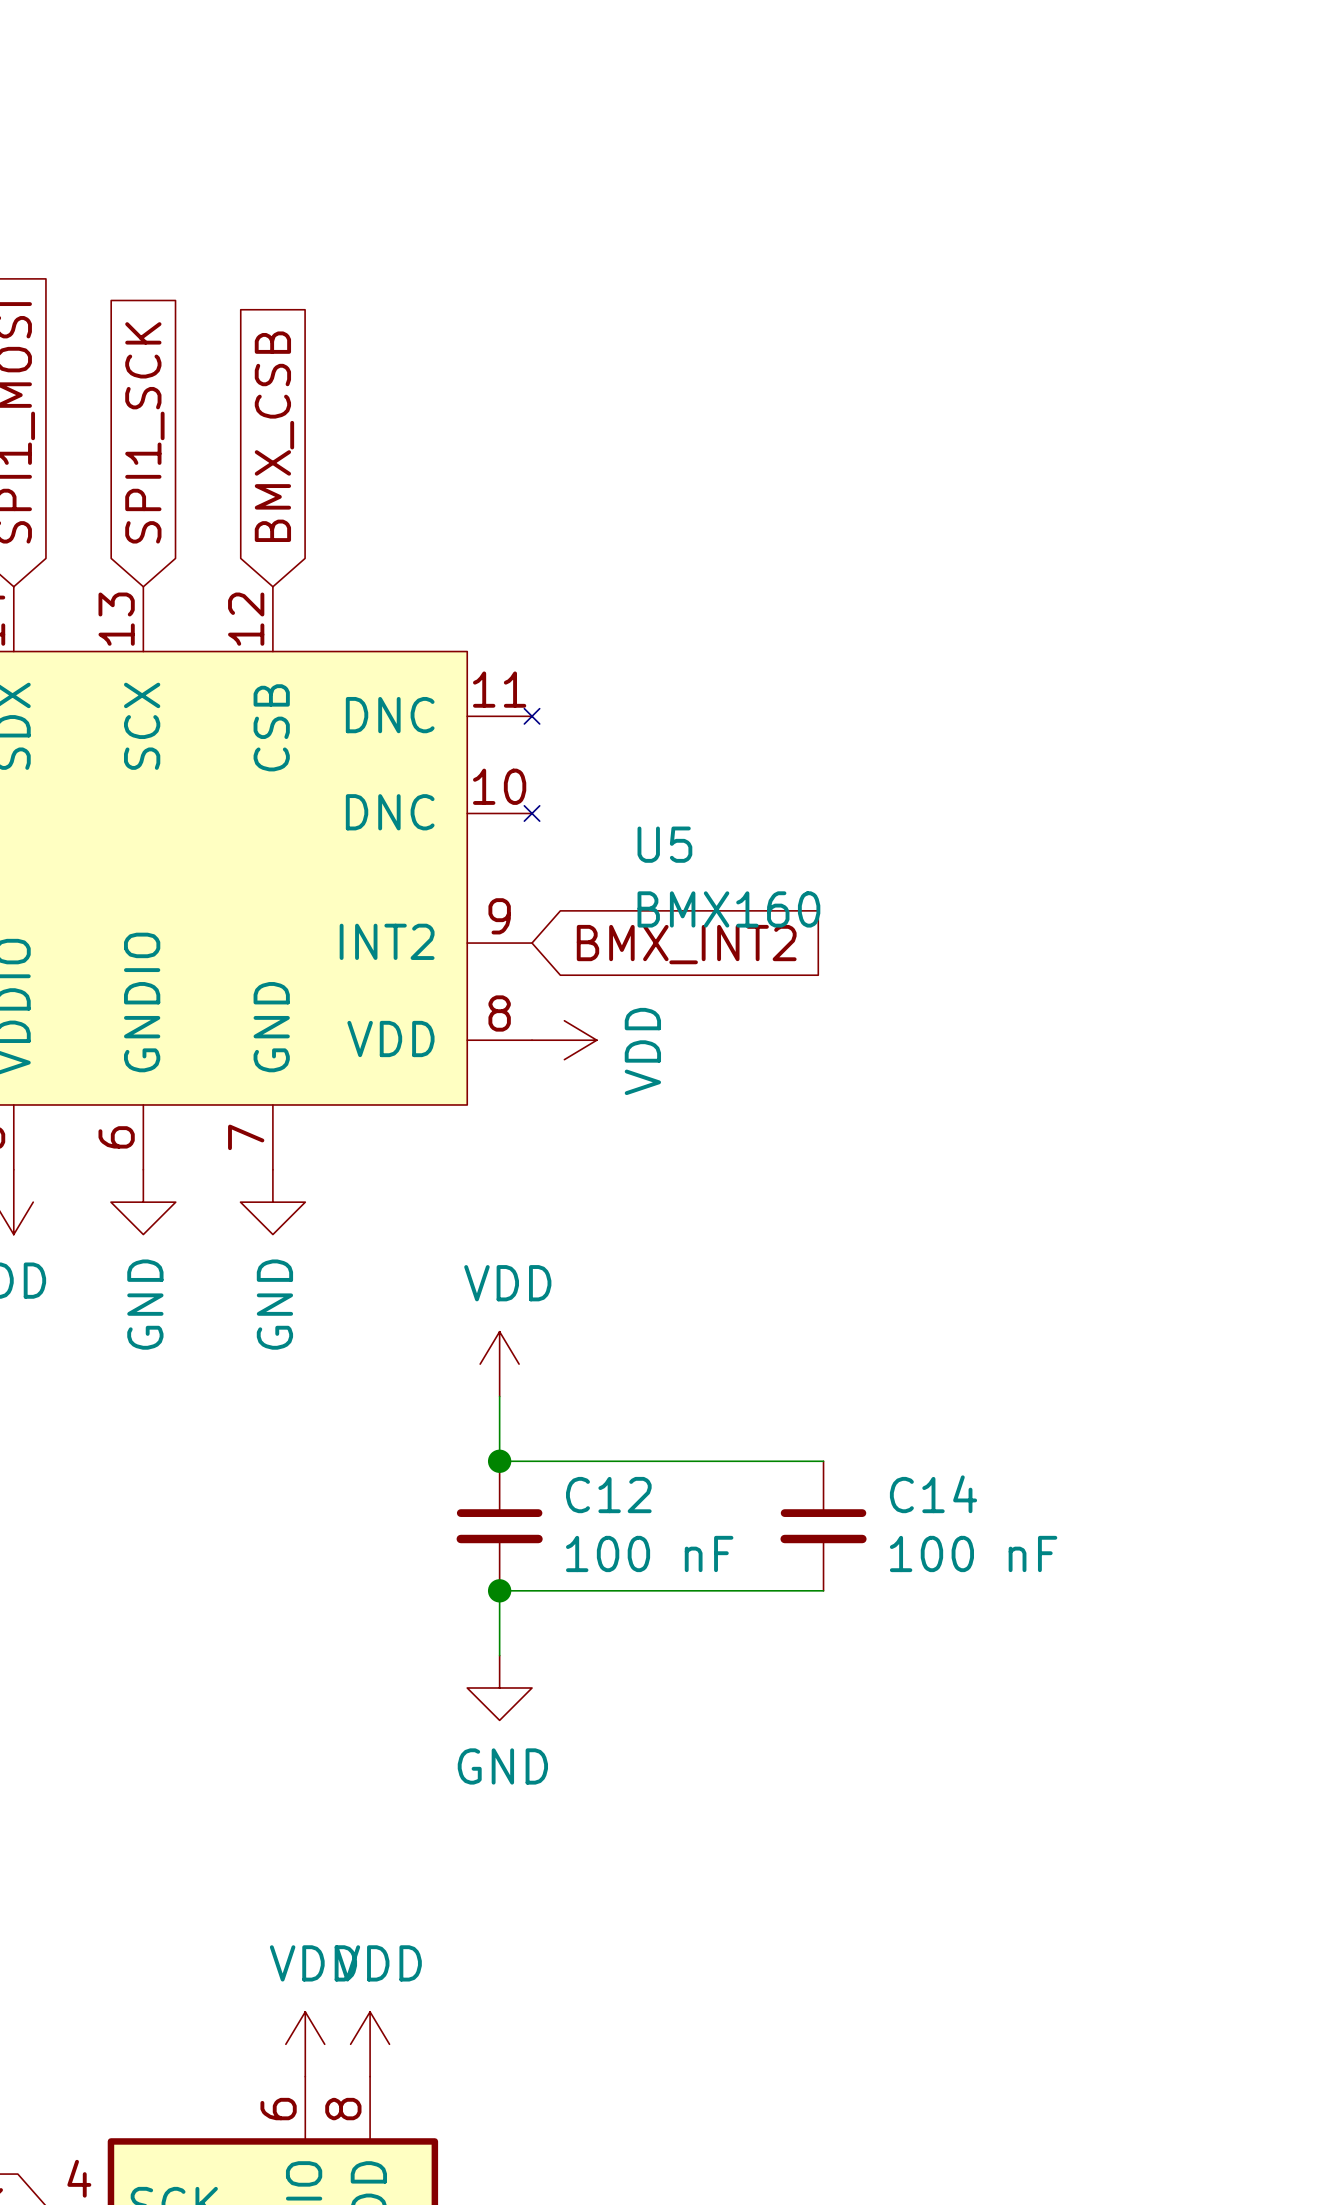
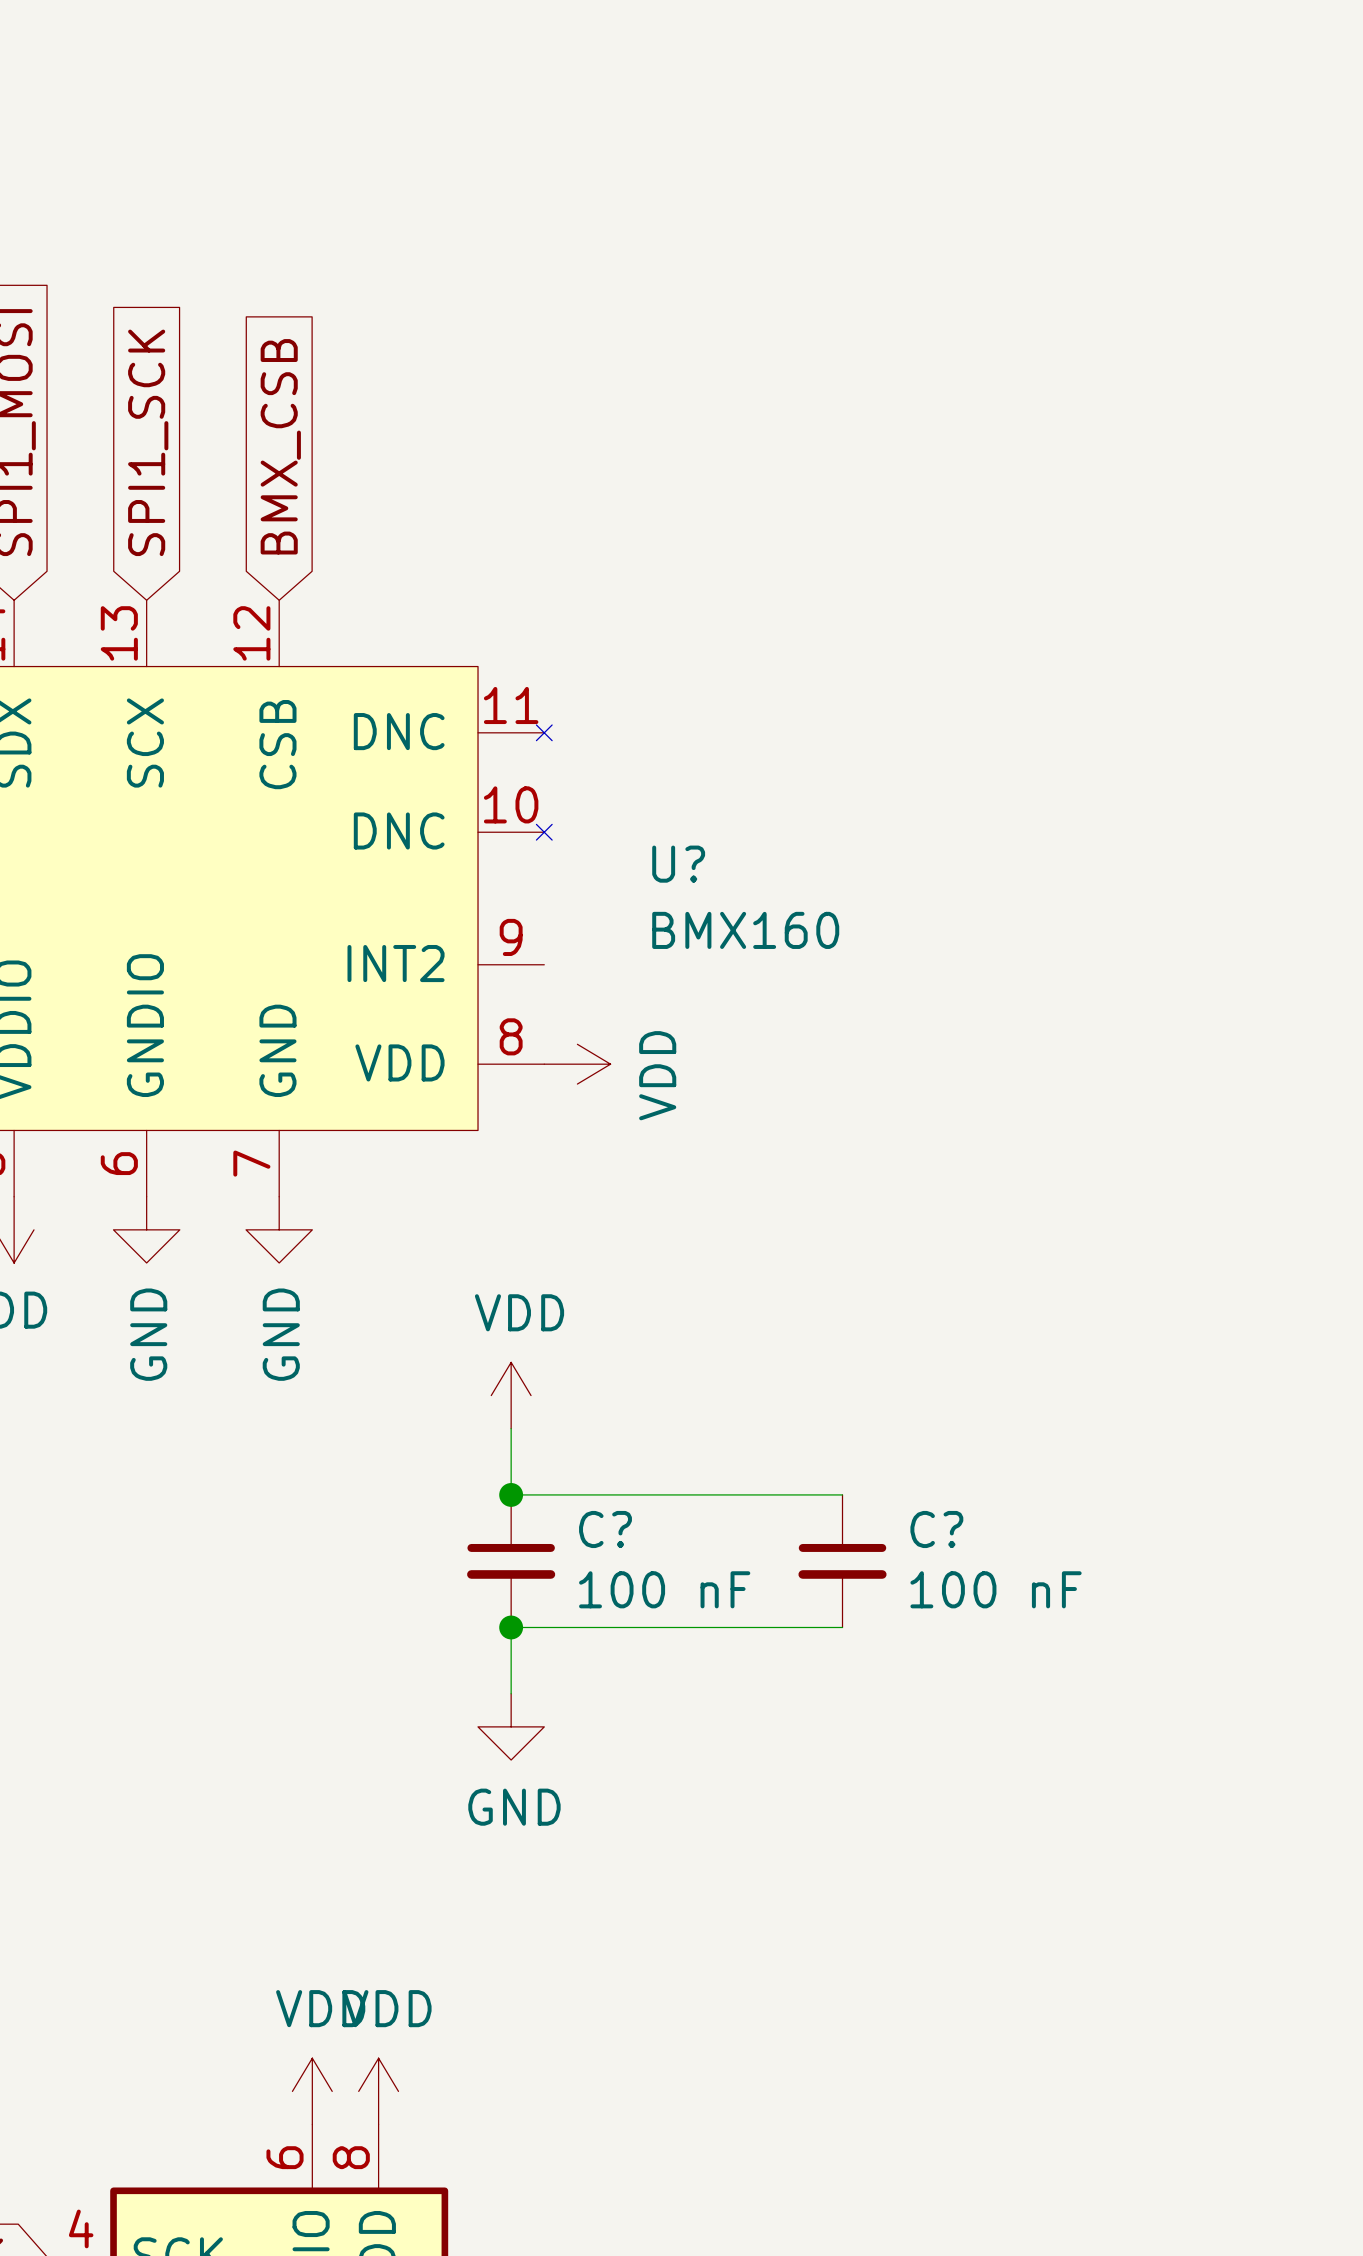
U5 name: U5 (664, 844) -> U? (678, 864)
global label: BMX_INT2 (686, 944) -> none
C14 name: C14 (933, 1494) -> C? (936, 1529)
C12 name: C12 (608, 1495) -> C? (605, 1529)

